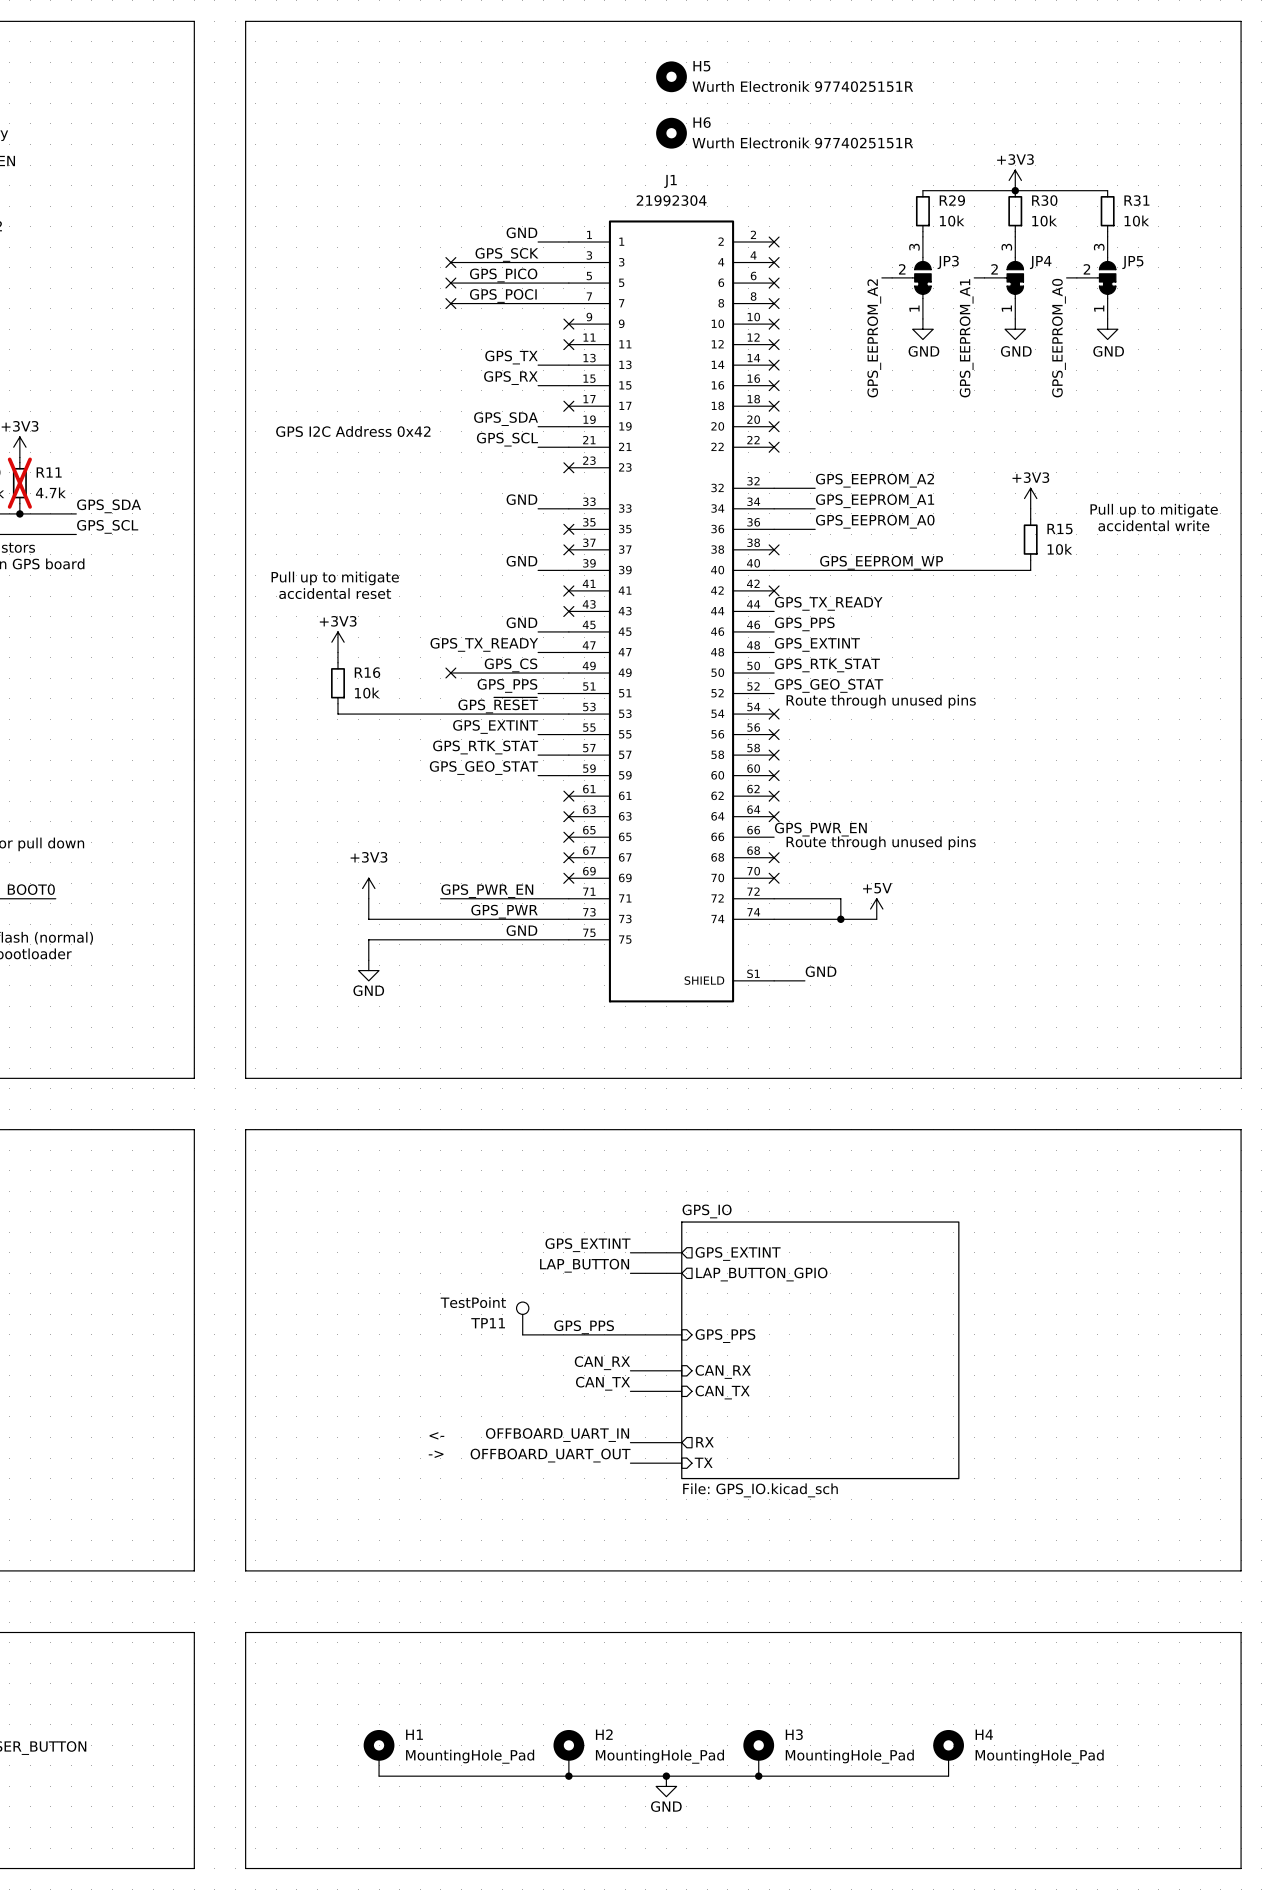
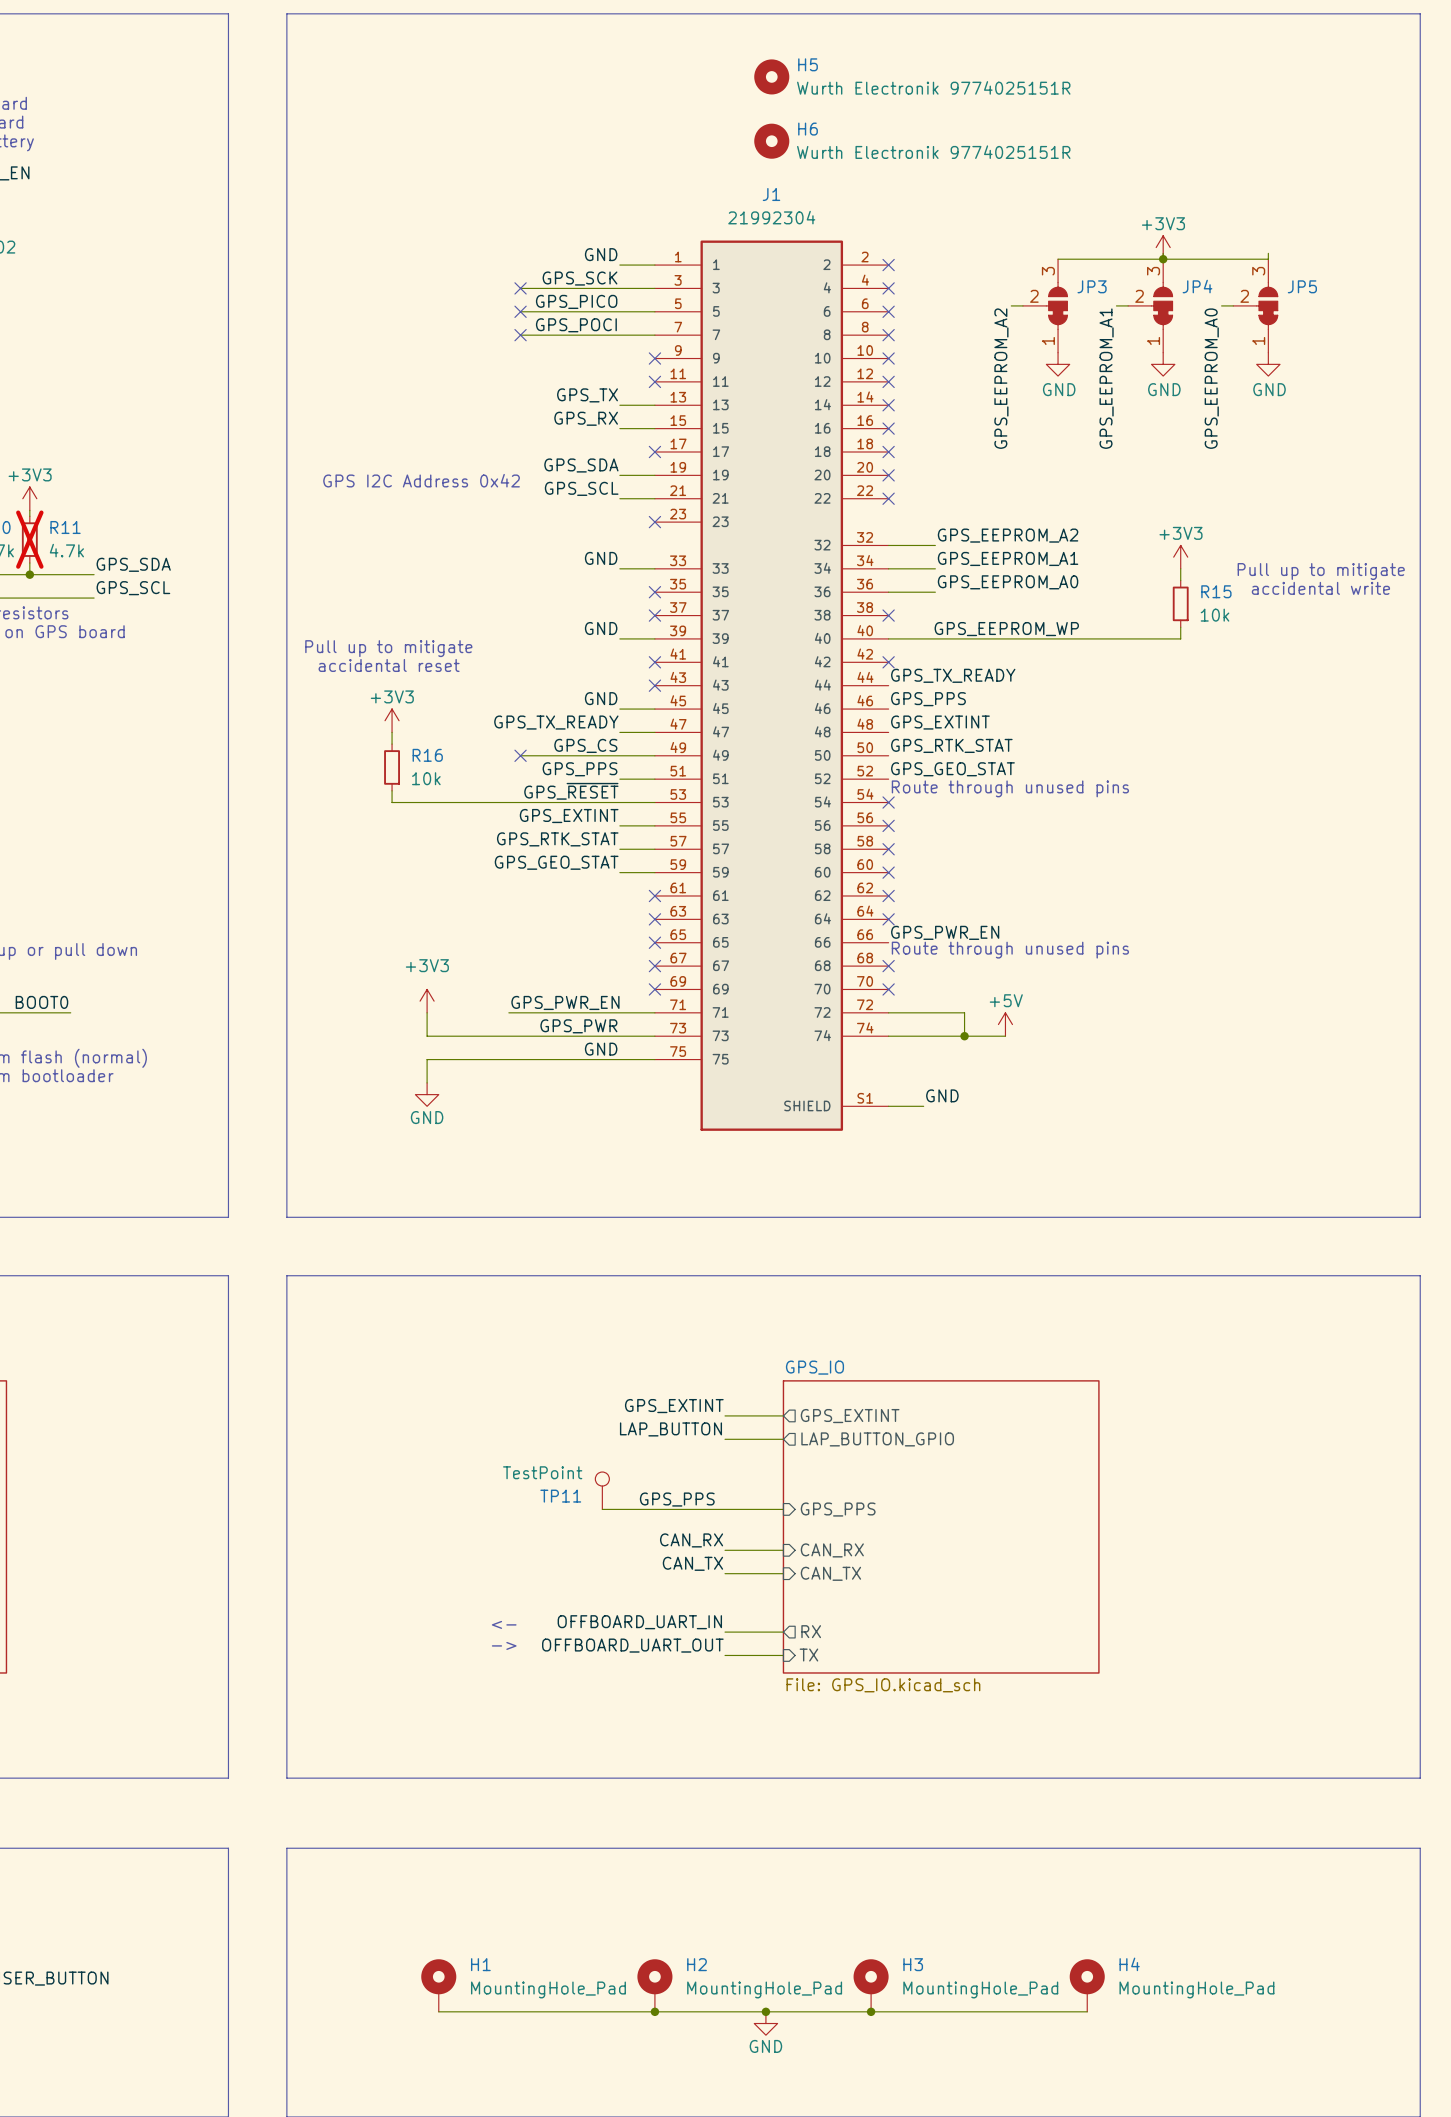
power symbol position: +3V3 (1015, 180) -> +3V3 (1163, 247)
wire: (922, 190) (1107, 190) -> none
junction position: (1015, 190) -> (1163, 259)
R29: 10k (922, 211) -> none
R30: 10k (1015, 211) -> none
R31: 10k (1107, 211) -> none
wire: (922, 231) (922, 236) -> (1268, 259) (1058, 259)

